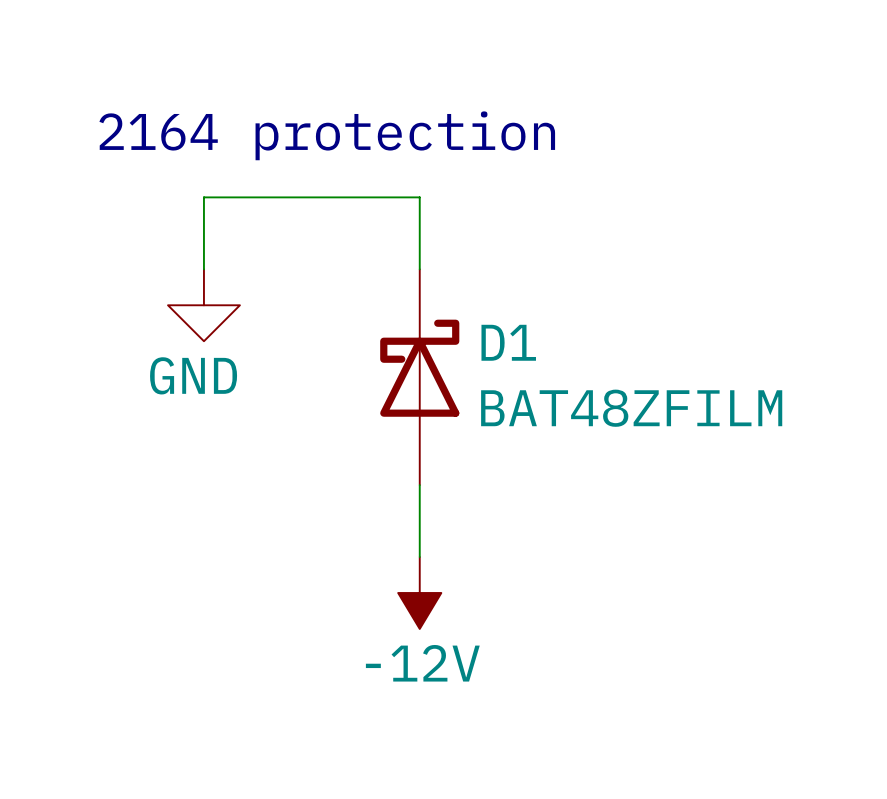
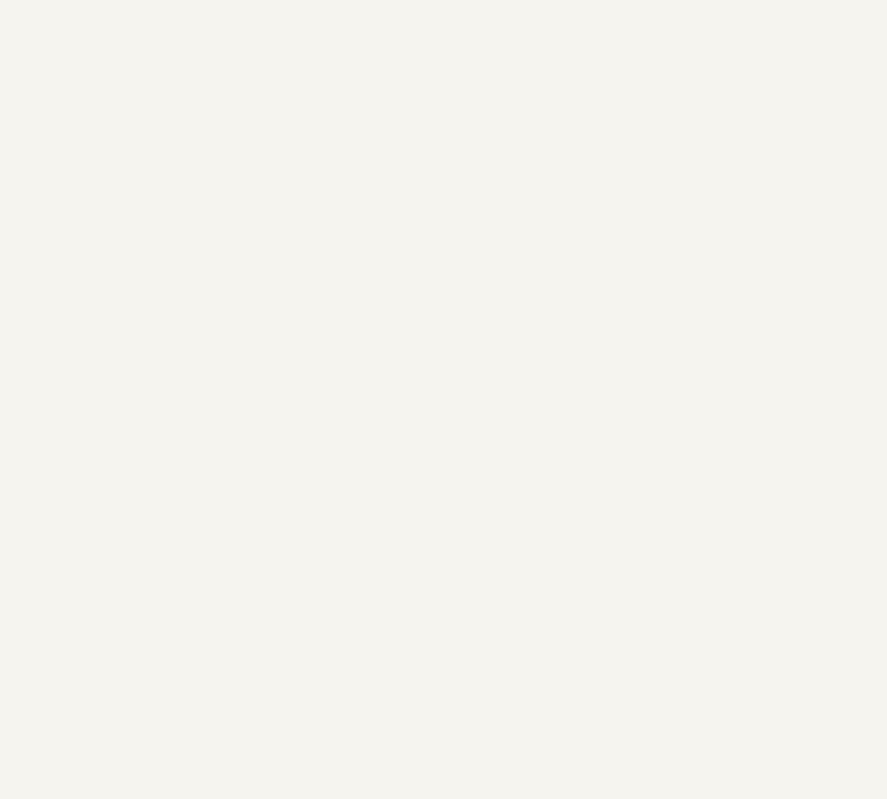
text: 2164 protection (327, 135) -> none
wire: (203, 269) (203, 197) (419, 197) (419, 269) -> none
power symbol: GND (203, 305) -> none
D1: BAT48ZFILM (419, 377) -> none
wire: (419, 485) (419, 557) -> none
power symbol: -12V (419, 592) -> none

